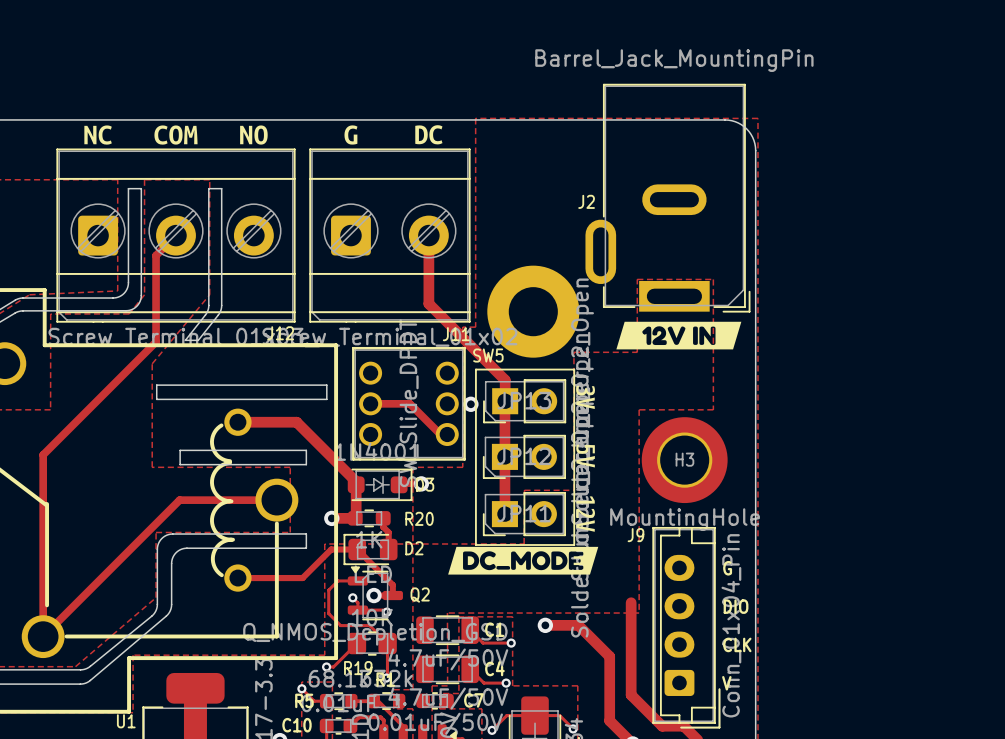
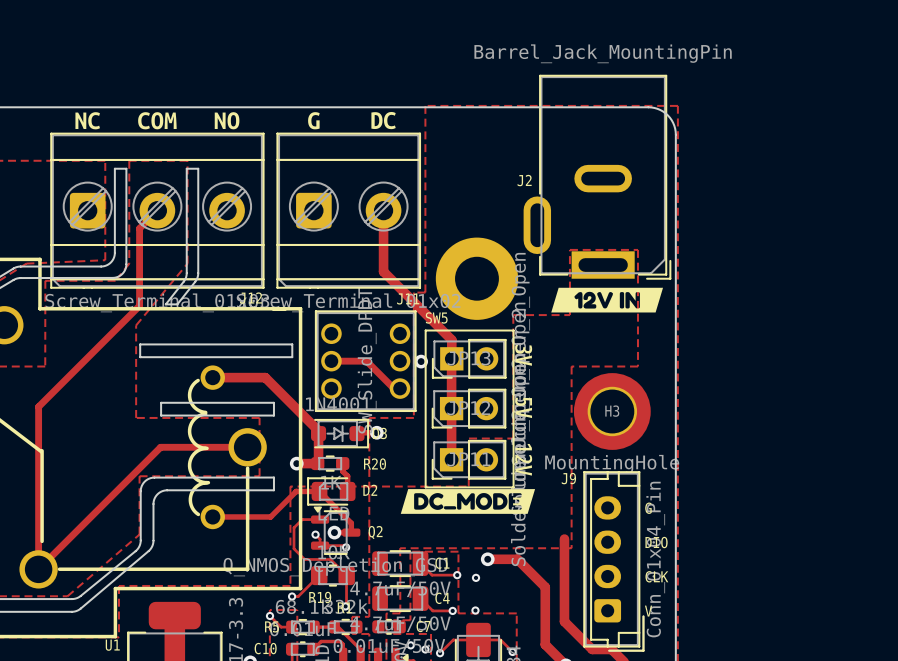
via: none -> (476, 577)
via: none -> (475, 610)
via: none -> (410, 645)
via: none -> (425, 649)

